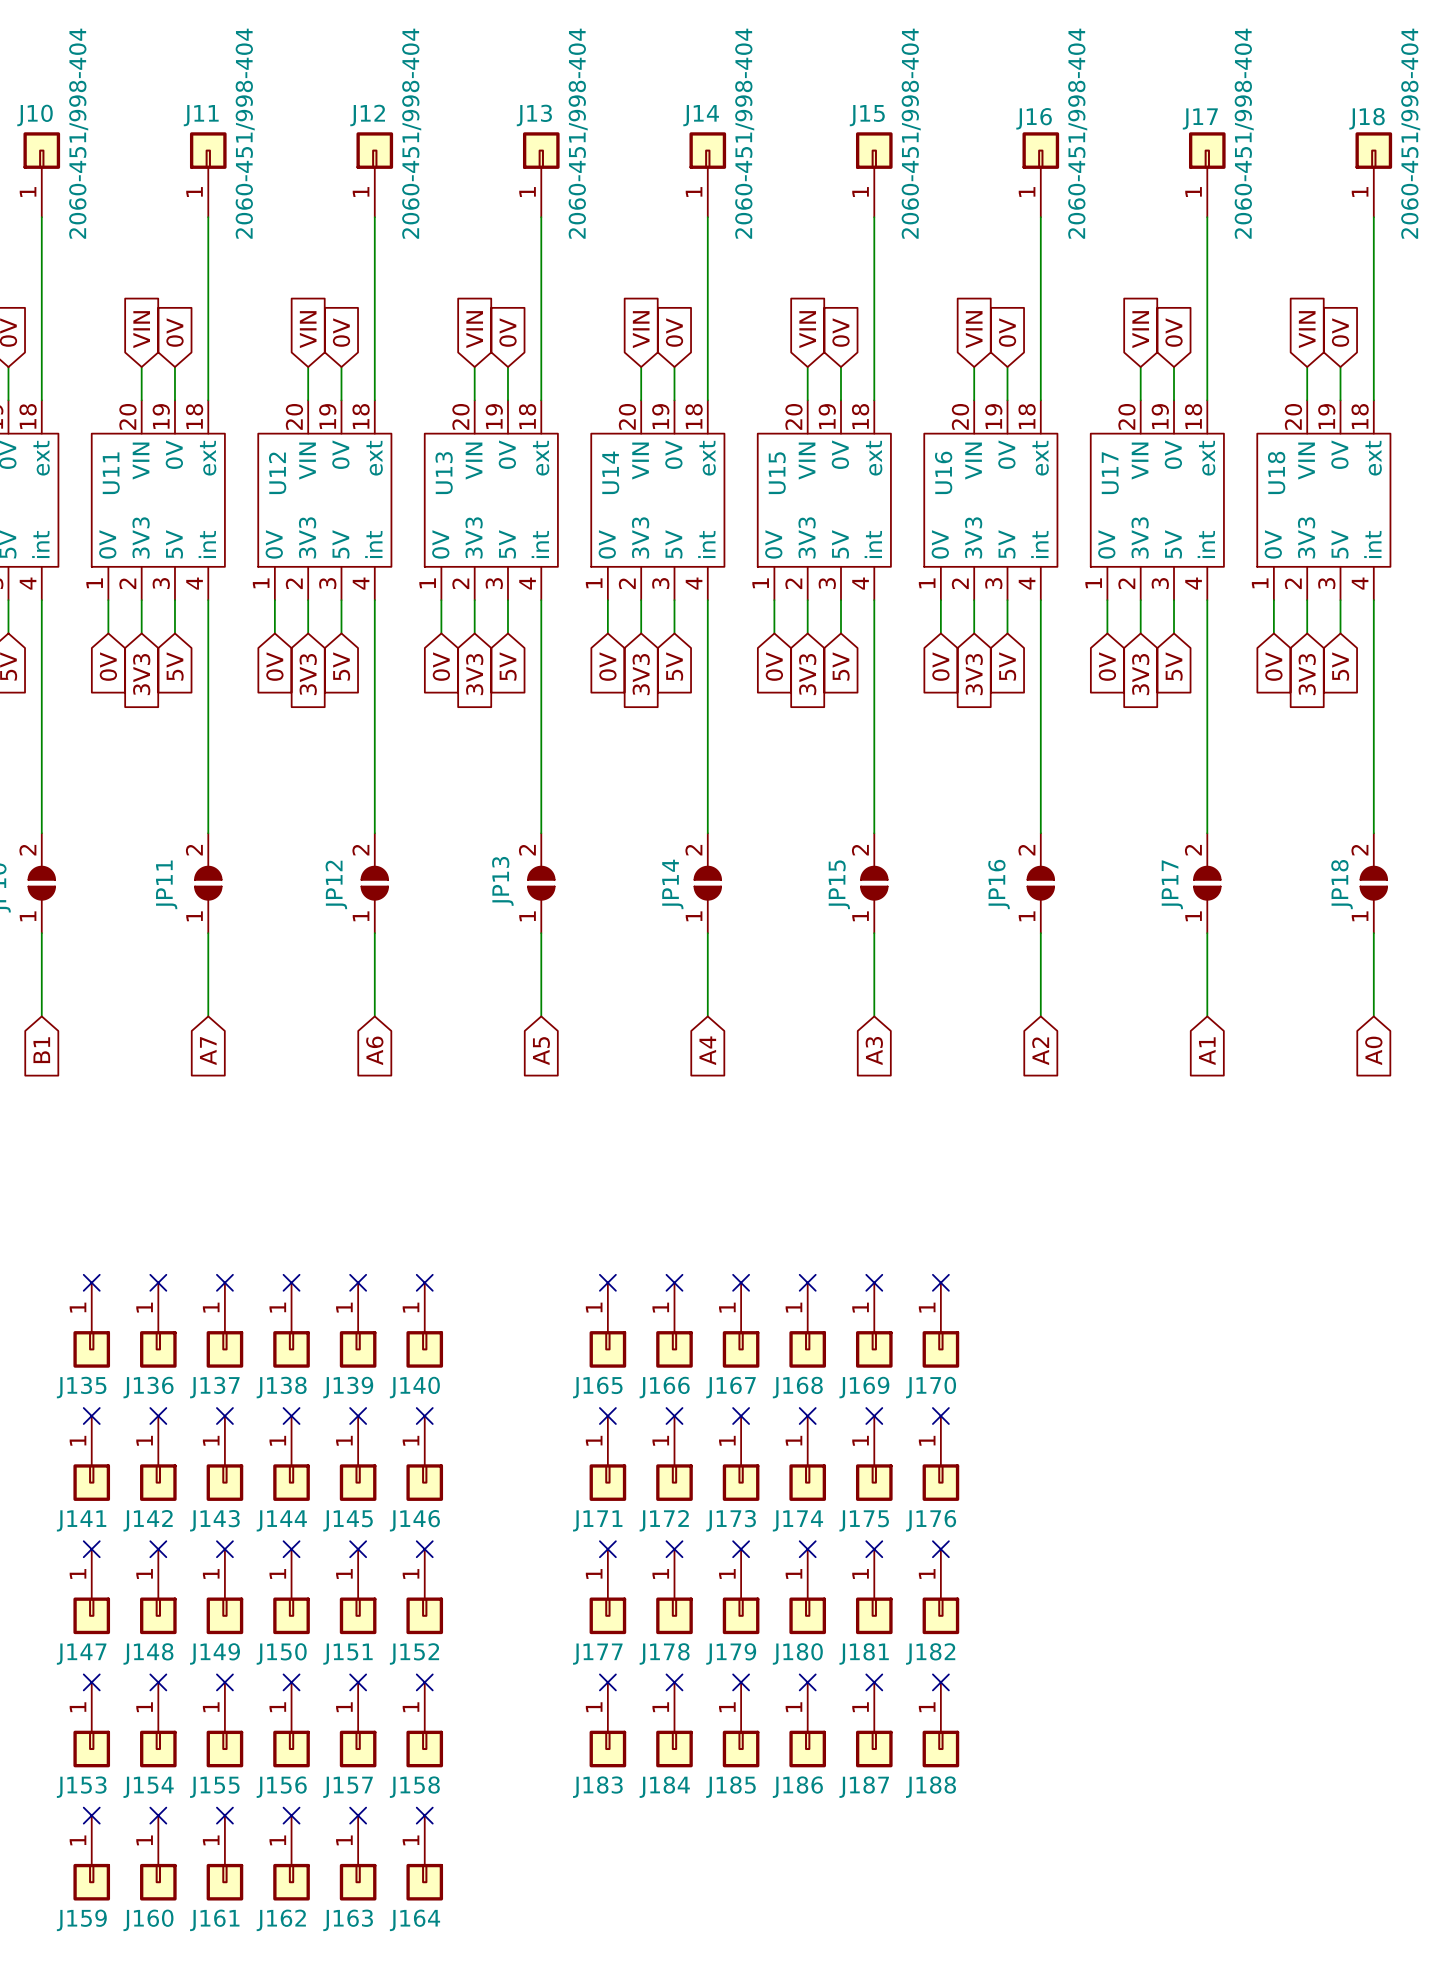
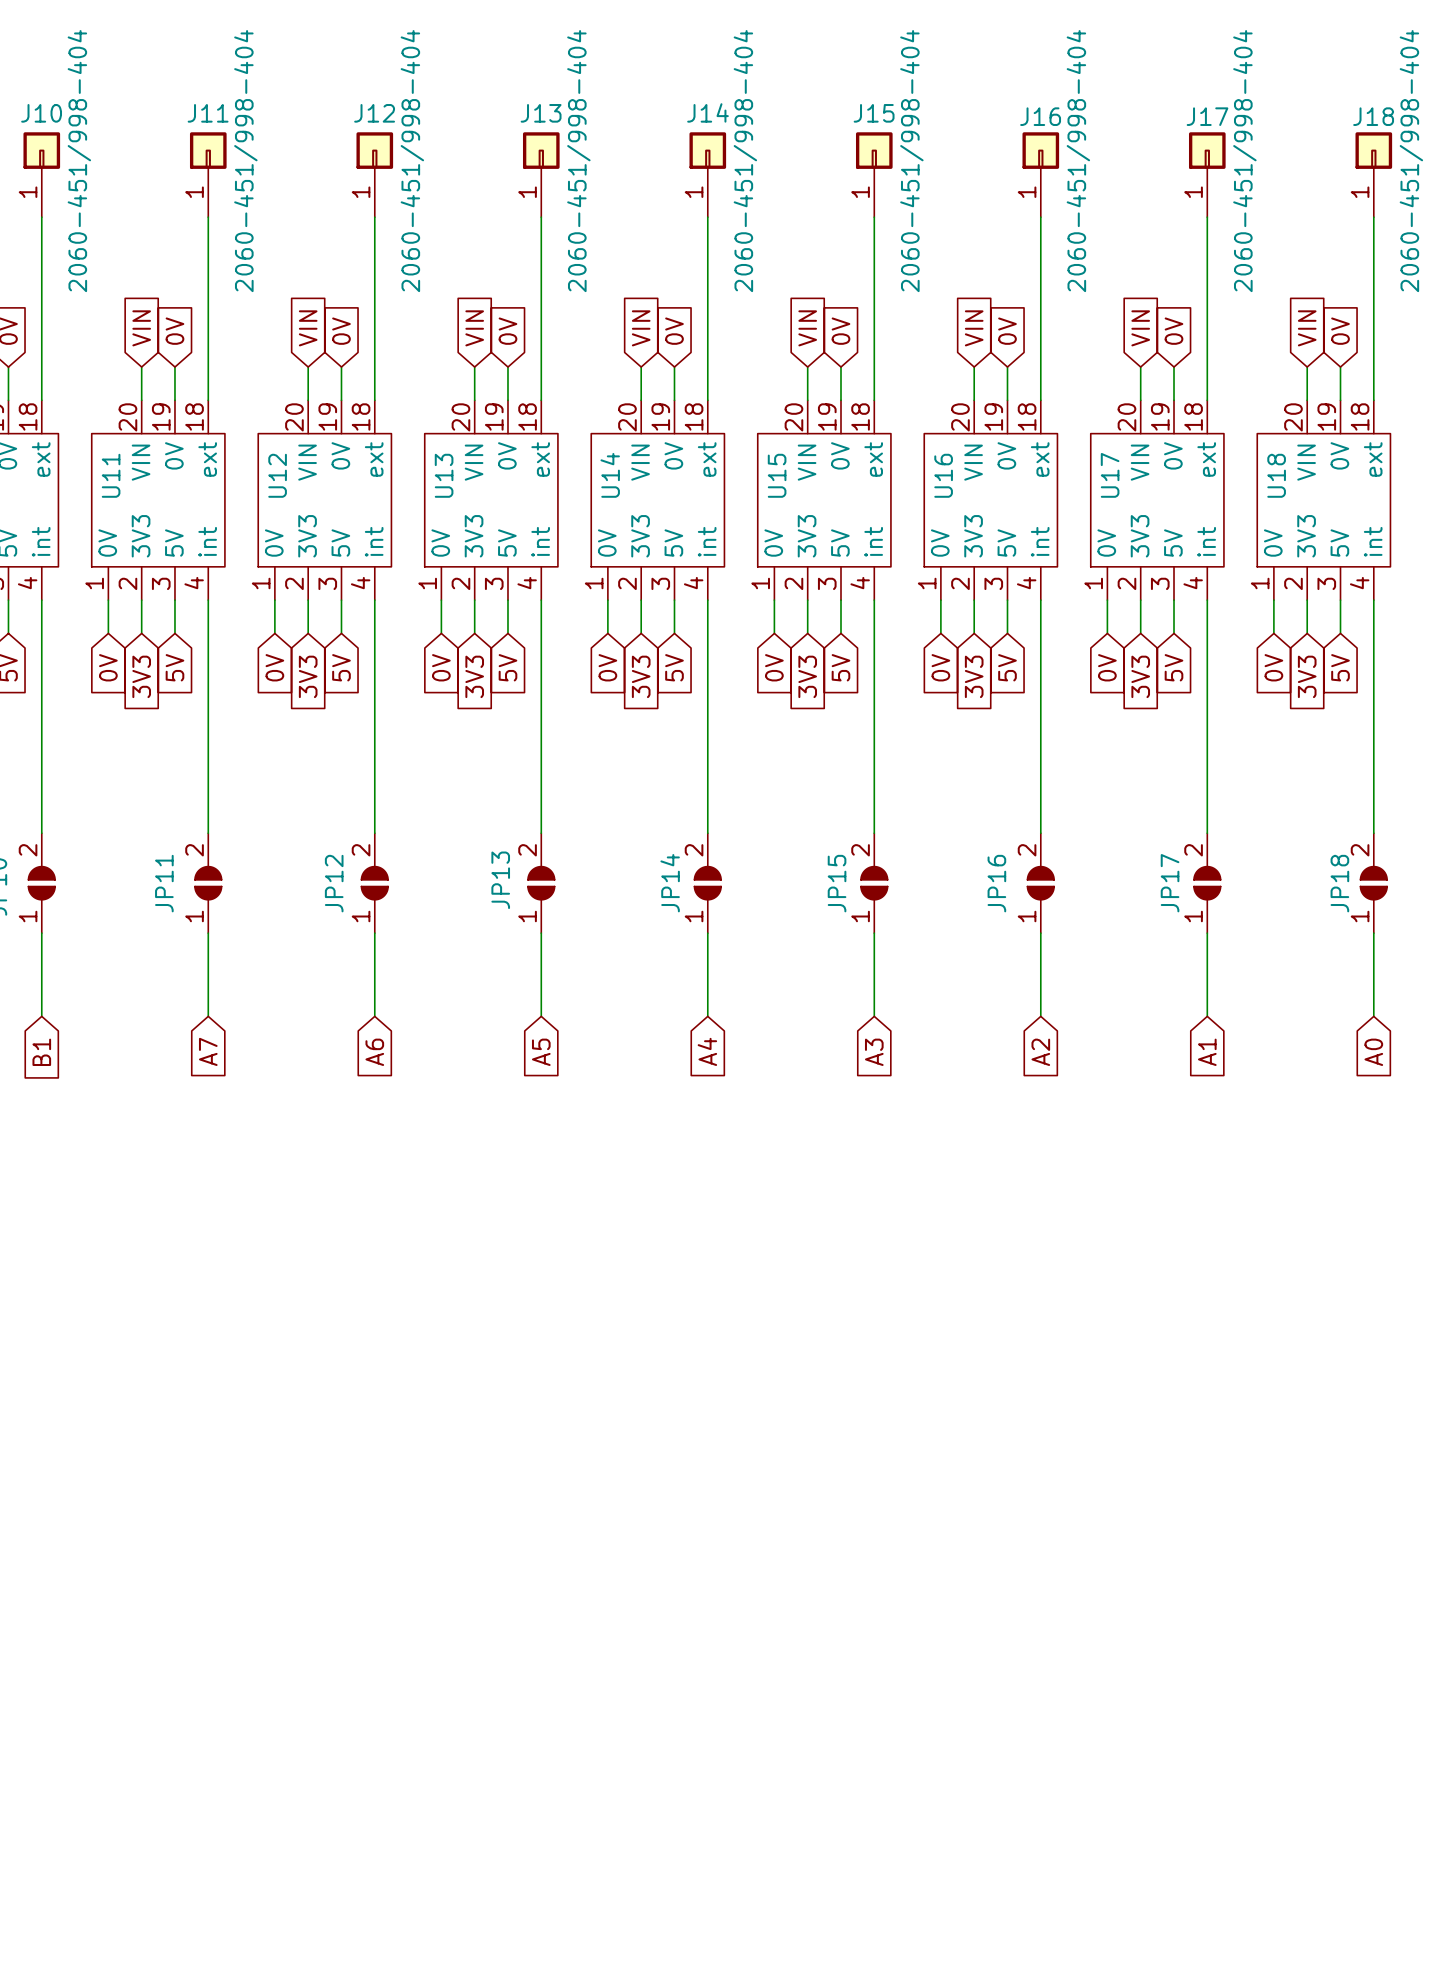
no-connect mark: (91, 1282) -> none
no-connect mark: (158, 1282) -> none
no-connect mark: (224, 1282) -> none
no-connect mark: (291, 1282) -> none
no-connect mark: (358, 1282) -> none
no-connect mark: (424, 1282) -> none
no-connect mark: (607, 1282) -> none
no-connect mark: (674, 1282) -> none
no-connect mark: (741, 1282) -> none
no-connect mark: (807, 1282) -> none
no-connect mark: (874, 1282) -> none
no-connect mark: (940, 1282) -> none
J135: (91, 1325) -> none
J136: (158, 1325) -> none
J137: (224, 1325) -> none
J138: (291, 1325) -> none
J139: (358, 1325) -> none
J140: (424, 1325) -> none
J165: (607, 1325) -> none
J166: (674, 1325) -> none
J167: (741, 1325) -> none
J168: (807, 1325) -> none
J169: (874, 1325) -> none
J170: (940, 1325) -> none
no-connect mark: (91, 1416) -> none
no-connect mark: (158, 1416) -> none
no-connect mark: (224, 1416) -> none
no-connect mark: (291, 1416) -> none
no-connect mark: (358, 1416) -> none
no-connect mark: (424, 1416) -> none
no-connect mark: (607, 1416) -> none
no-connect mark: (674, 1416) -> none
no-connect mark: (741, 1416) -> none
no-connect mark: (807, 1416) -> none
no-connect mark: (874, 1416) -> none
no-connect mark: (940, 1416) -> none
J141: (91, 1458) -> none
J142: (158, 1458) -> none
J143: (224, 1458) -> none
J144: (291, 1458) -> none
J145: (358, 1458) -> none
J146: (424, 1458) -> none
J171: (607, 1458) -> none
J172: (674, 1458) -> none
J173: (741, 1458) -> none
J174: (807, 1458) -> none
J175: (874, 1458) -> none
J176: (940, 1458) -> none
no-connect mark: (91, 1549) -> none
no-connect mark: (158, 1549) -> none
no-connect mark: (224, 1549) -> none
no-connect mark: (291, 1549) -> none
no-connect mark: (358, 1549) -> none
no-connect mark: (424, 1549) -> none
no-connect mark: (607, 1549) -> none
no-connect mark: (674, 1549) -> none
no-connect mark: (741, 1549) -> none
no-connect mark: (807, 1549) -> none
no-connect mark: (874, 1549) -> none
no-connect mark: (940, 1549) -> none
J147: (91, 1591) -> none
J148: (158, 1591) -> none
J149: (224, 1591) -> none
J150: (291, 1591) -> none
J151: (358, 1591) -> none
J152: (424, 1591) -> none
J177: (607, 1591) -> none
J178: (674, 1591) -> none
J179: (741, 1591) -> none
J180: (807, 1591) -> none
J181: (874, 1591) -> none
J182: (940, 1591) -> none
no-connect mark: (91, 1682) -> none
no-connect mark: (158, 1682) -> none
no-connect mark: (224, 1682) -> none
no-connect mark: (291, 1682) -> none
no-connect mark: (358, 1682) -> none
no-connect mark: (424, 1682) -> none
no-connect mark: (607, 1682) -> none
no-connect mark: (674, 1682) -> none
no-connect mark: (741, 1682) -> none
no-connect mark: (807, 1682) -> none
no-connect mark: (874, 1682) -> none
no-connect mark: (940, 1682) -> none
J153: (91, 1724) -> none
J154: (158, 1724) -> none
J155: (224, 1724) -> none
J156: (291, 1724) -> none
J157: (358, 1724) -> none
J158: (424, 1724) -> none
J183: (607, 1724) -> none
J184: (674, 1724) -> none
J185: (741, 1724) -> none
J186: (807, 1724) -> none
J187: (874, 1724) -> none
J188: (940, 1724) -> none
no-connect mark: (91, 1815) -> none
no-connect mark: (158, 1815) -> none
no-connect mark: (224, 1815) -> none
no-connect mark: (291, 1815) -> none
no-connect mark: (358, 1815) -> none
no-connect mark: (424, 1815) -> none
J159: (91, 1858) -> none
J160: (158, 1858) -> none
J161: (224, 1858) -> none
J162: (291, 1858) -> none
J163: (358, 1858) -> none
J164: (424, 1858) -> none

